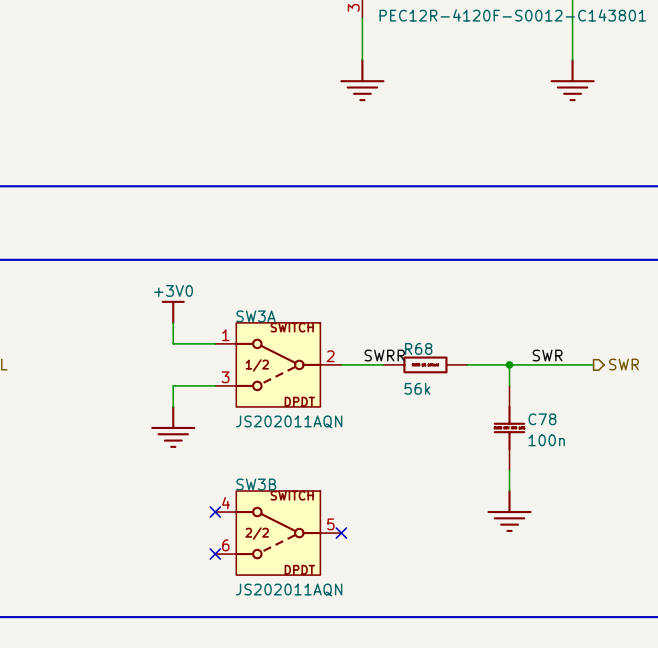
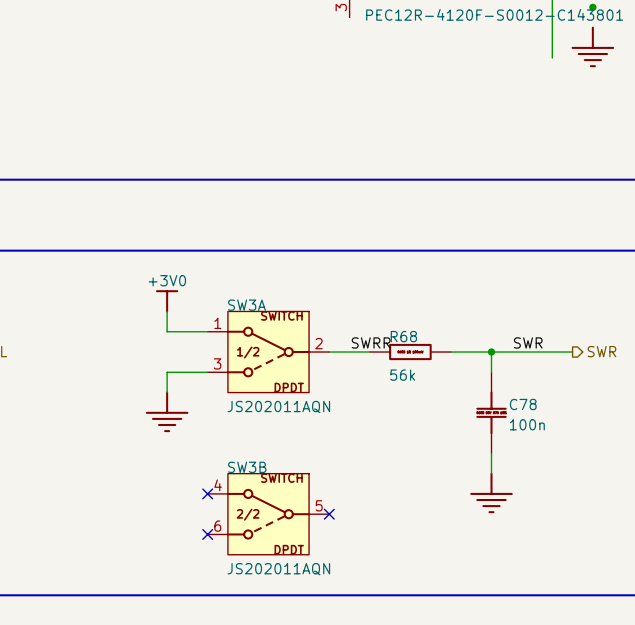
junction: none -> (592, 7)
wire: (362, 18) (362, 60) -> none
power symbol: (362, 80) -> none
power symbol position: (572, 80) -> (592, 46)

